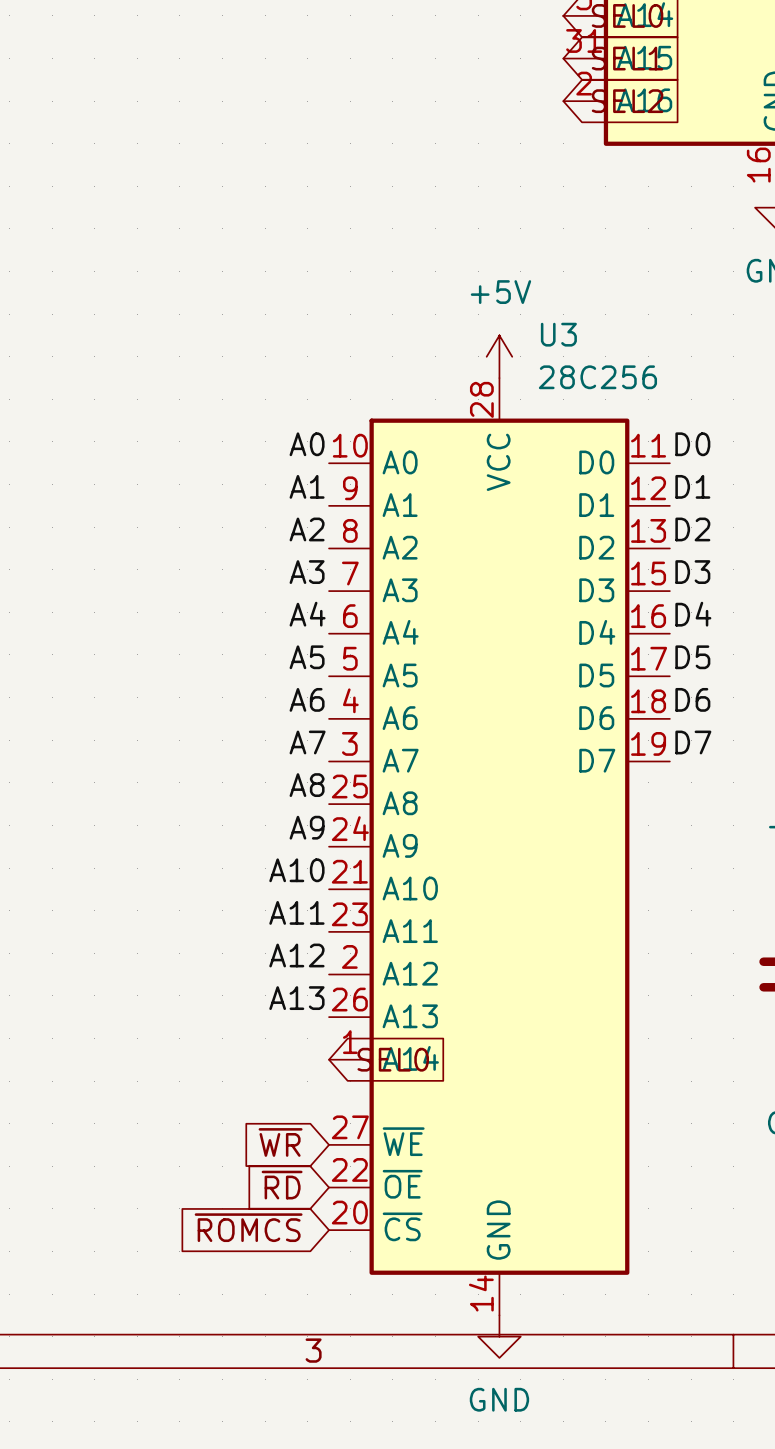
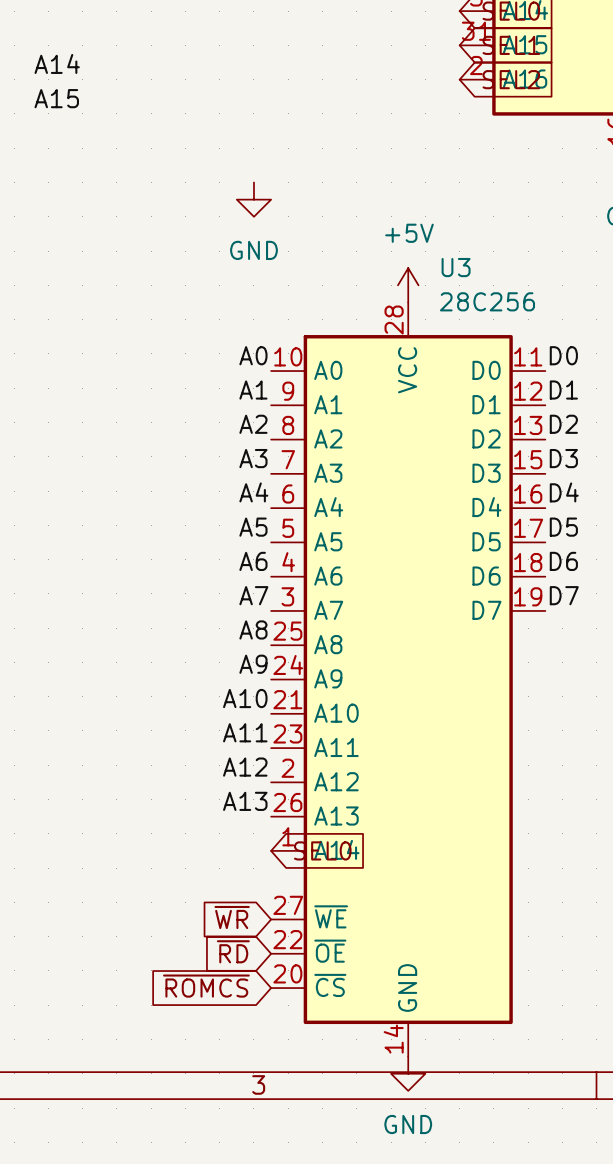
label: none -> A14 (57, 63)
label: none -> A15 (56, 98)
power symbol: none -> GND (253, 199)

